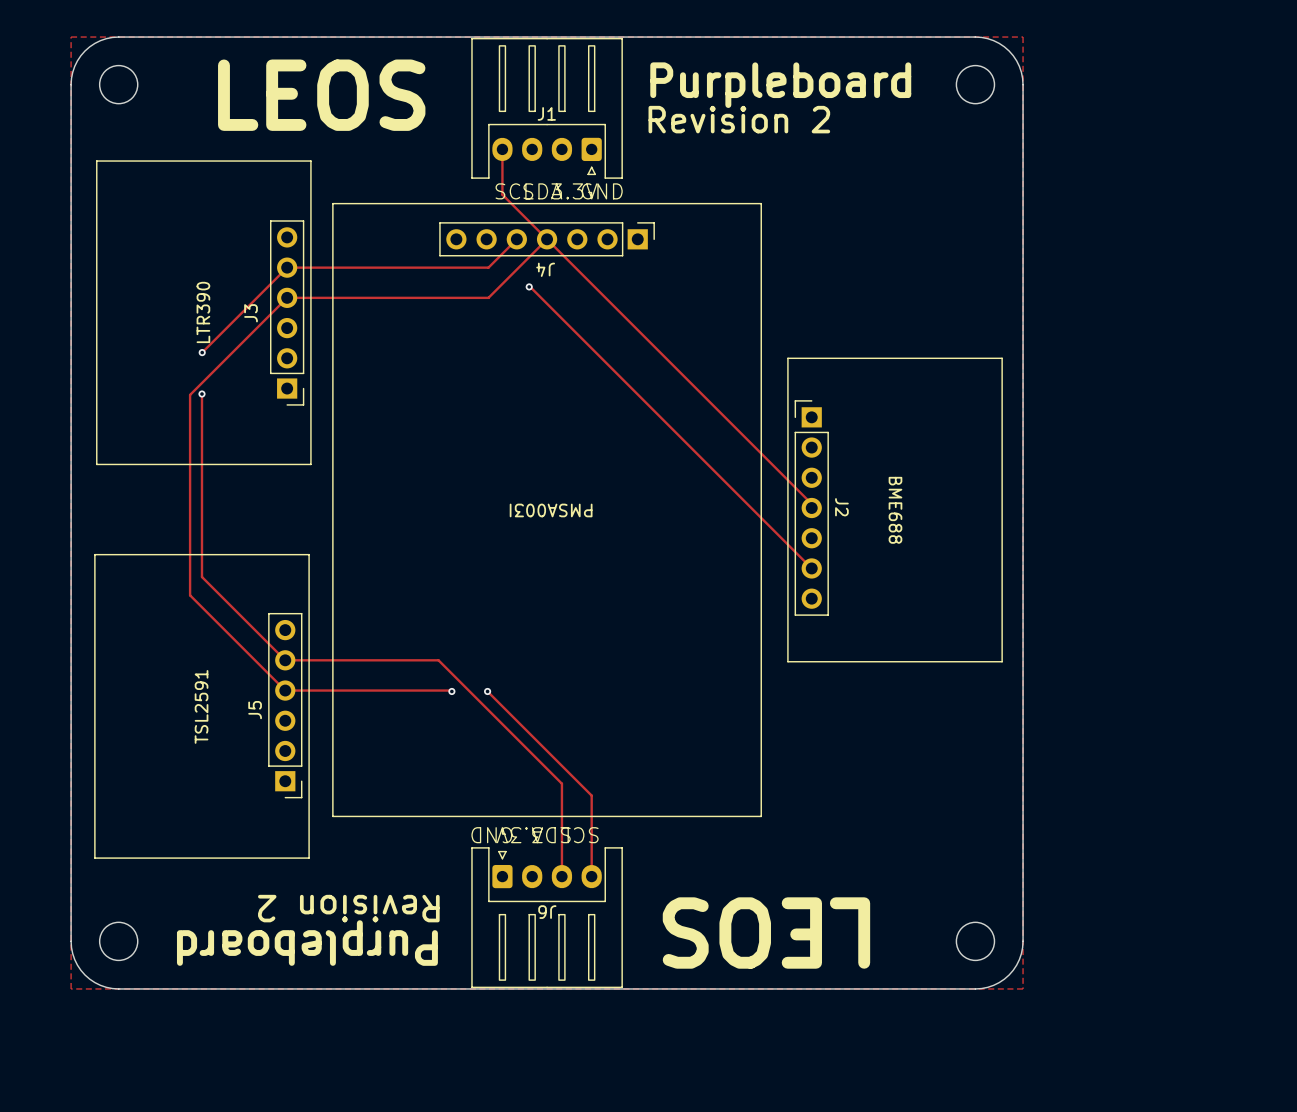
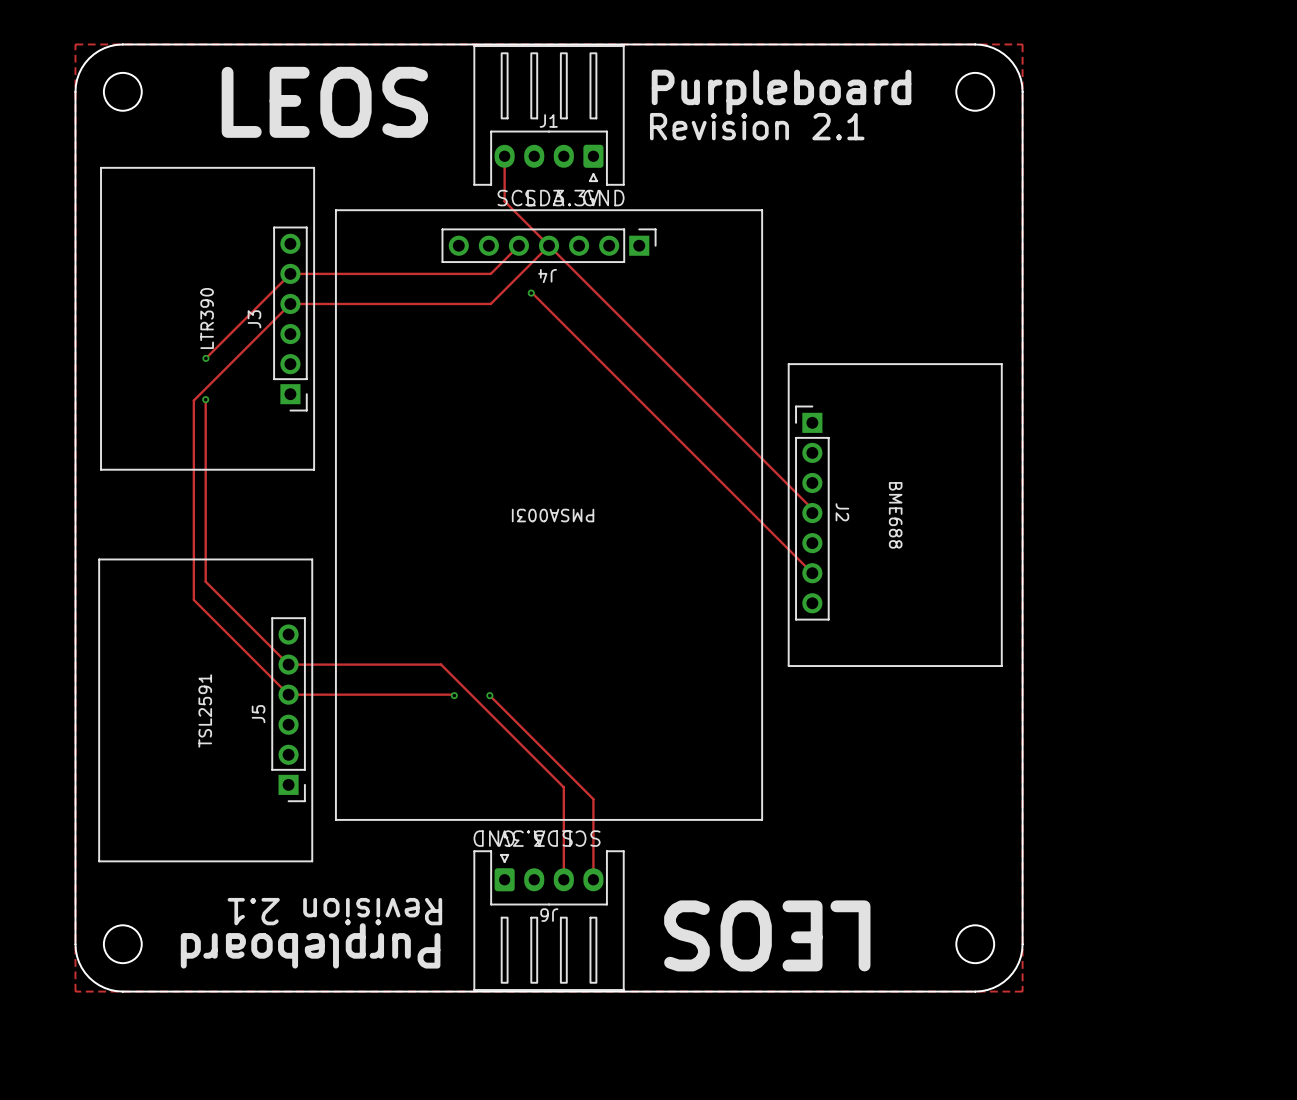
text: Revision 2 (739, 119) -> Revision 2.1 (757, 126)
text: Revision 2 (348, 908) -> Revision 2.1 (334, 911)

